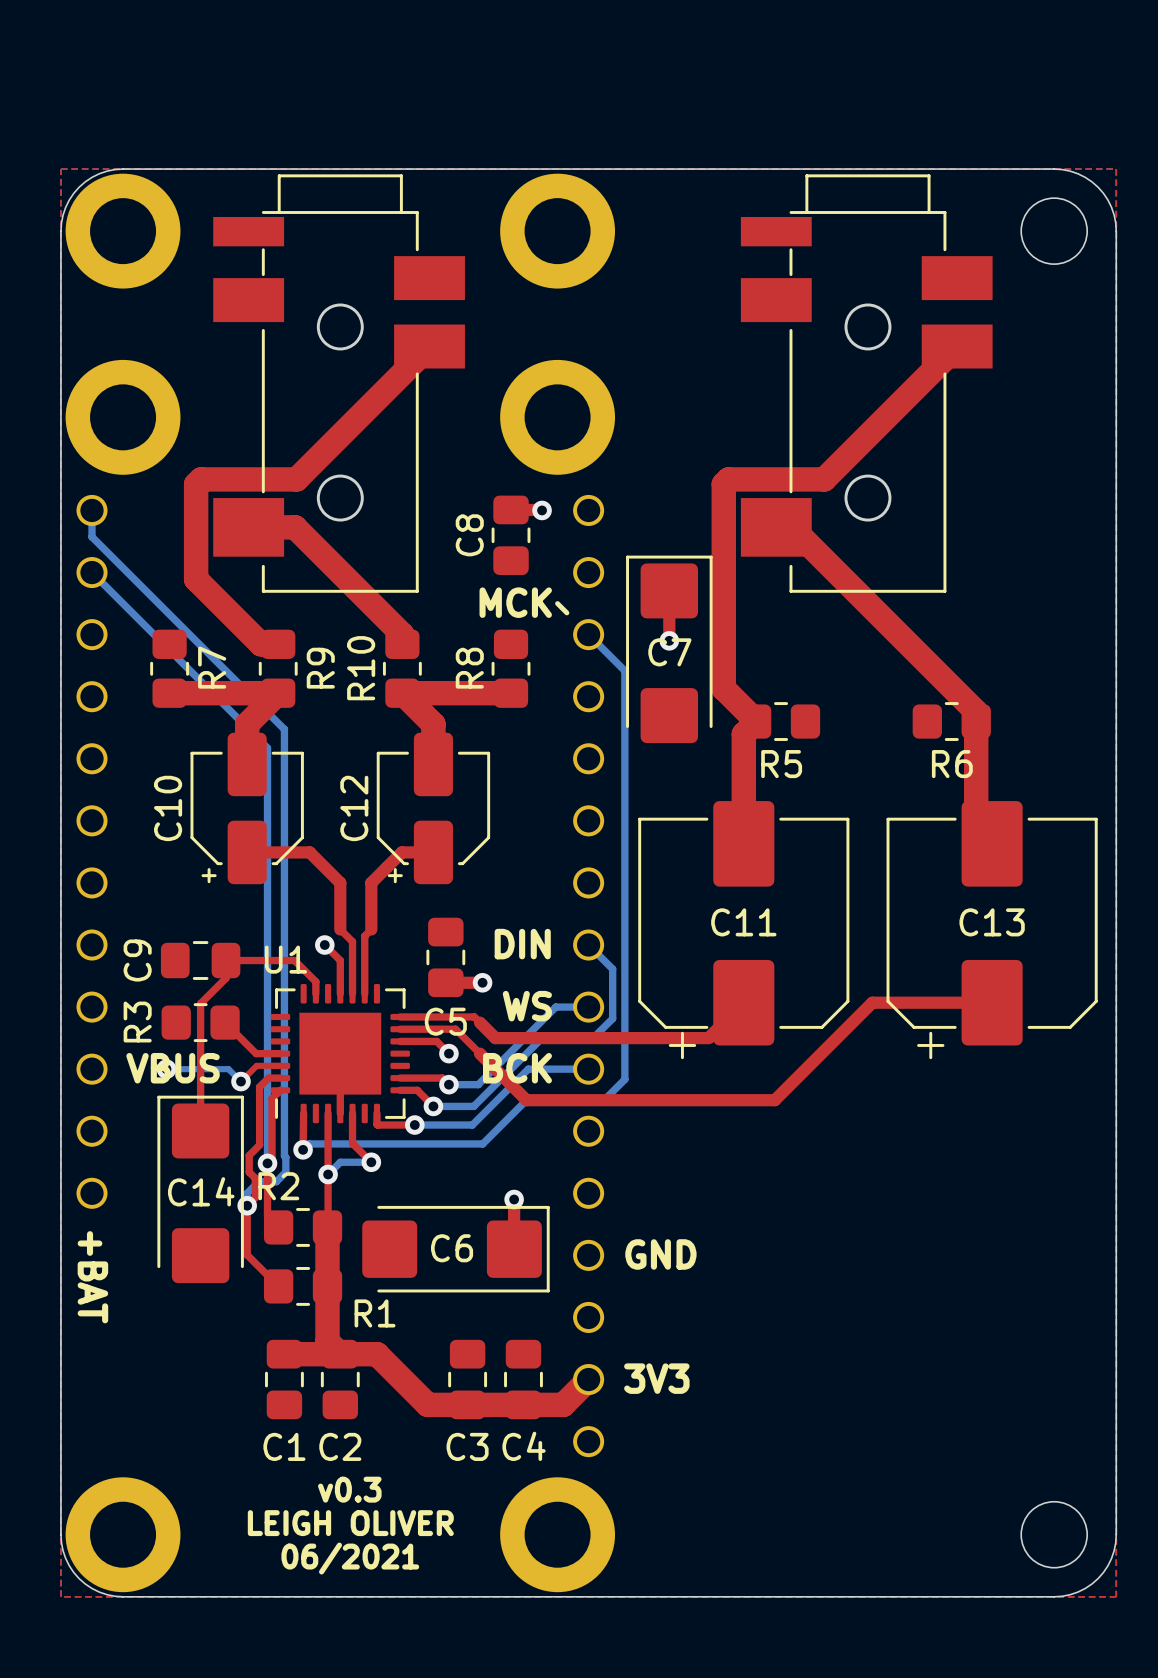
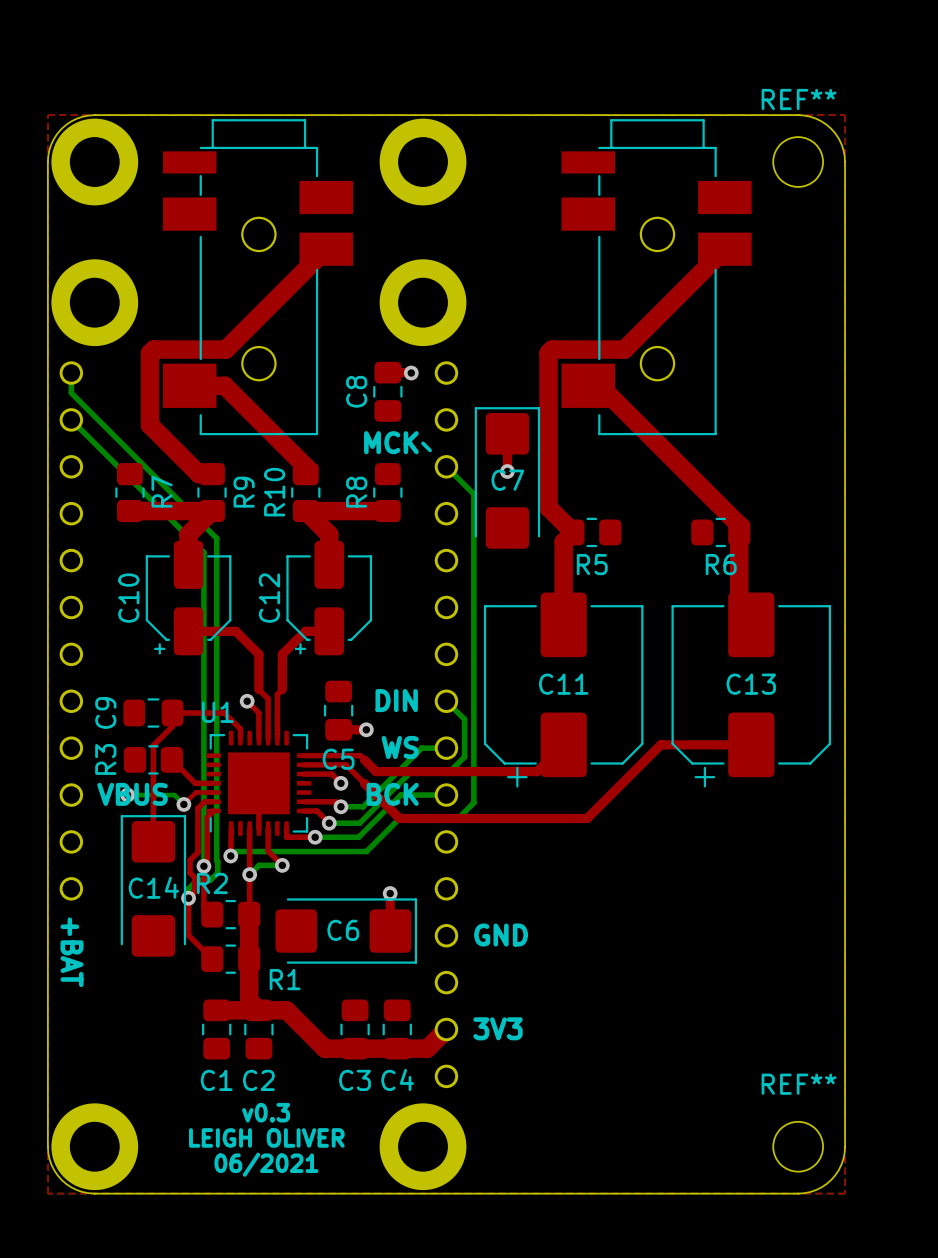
REF** name: none -> REF** (799, 99)
REF** name: none -> REF** (799, 1084)

